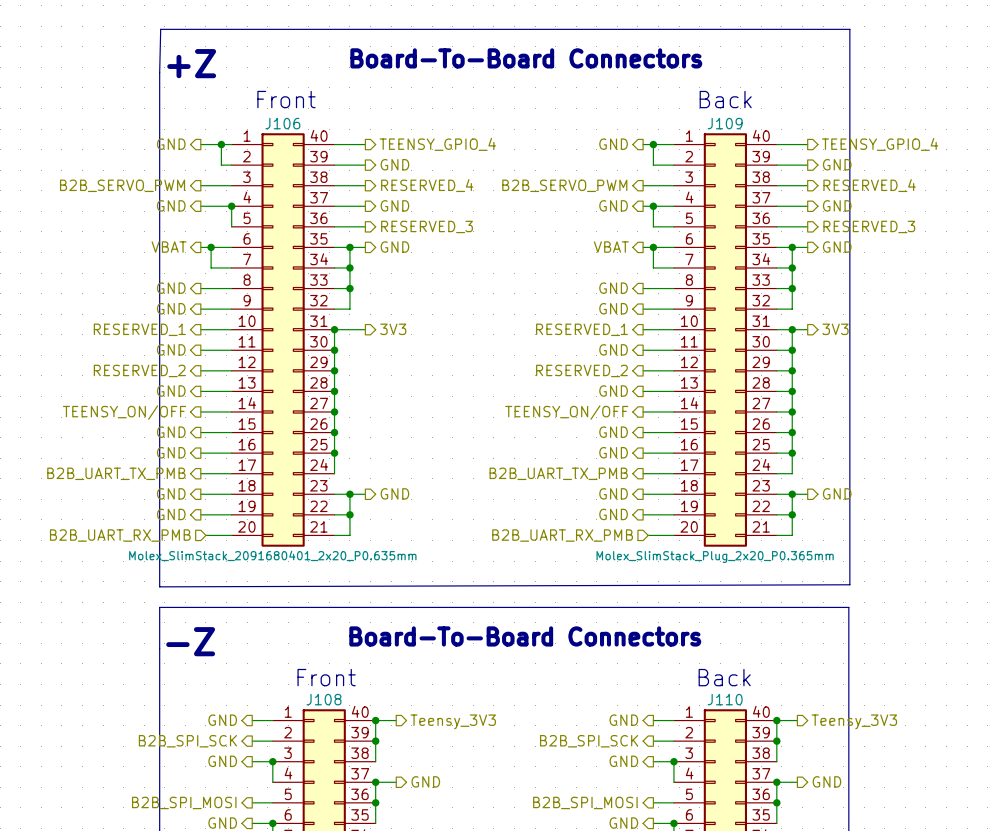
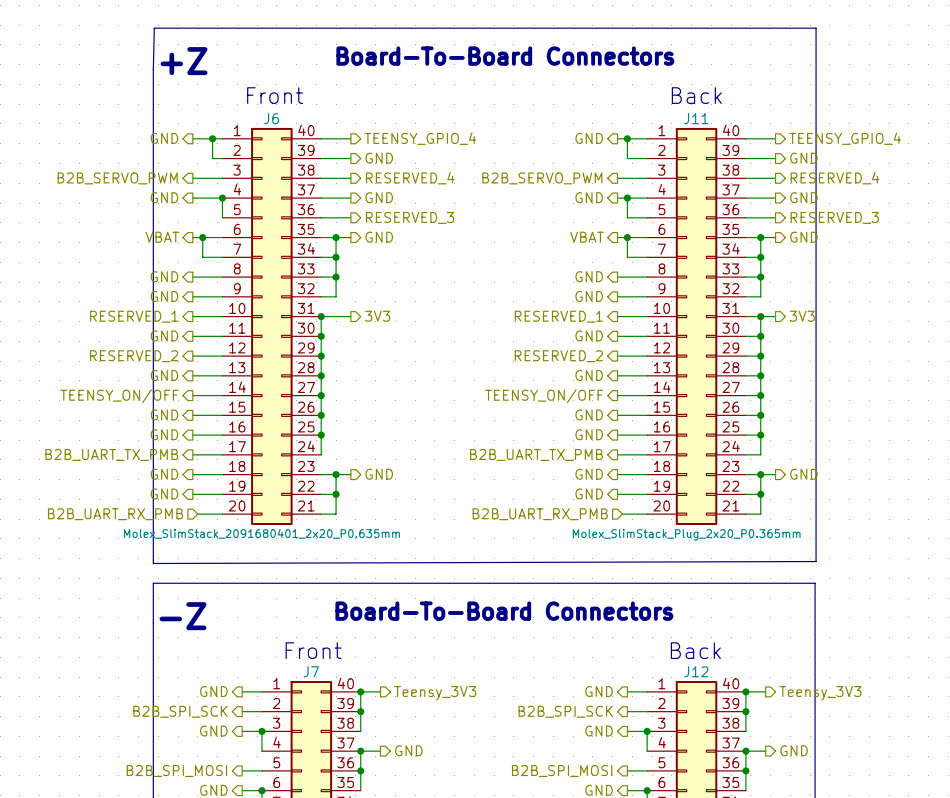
J106 name: J106 (282, 123) -> J6 (271, 118)
J109 name: J109 (725, 123) -> J11 (696, 118)
J108 name: J108 (324, 699) -> J7 (311, 671)
J110 name: J110 (725, 699) -> J12 (696, 671)

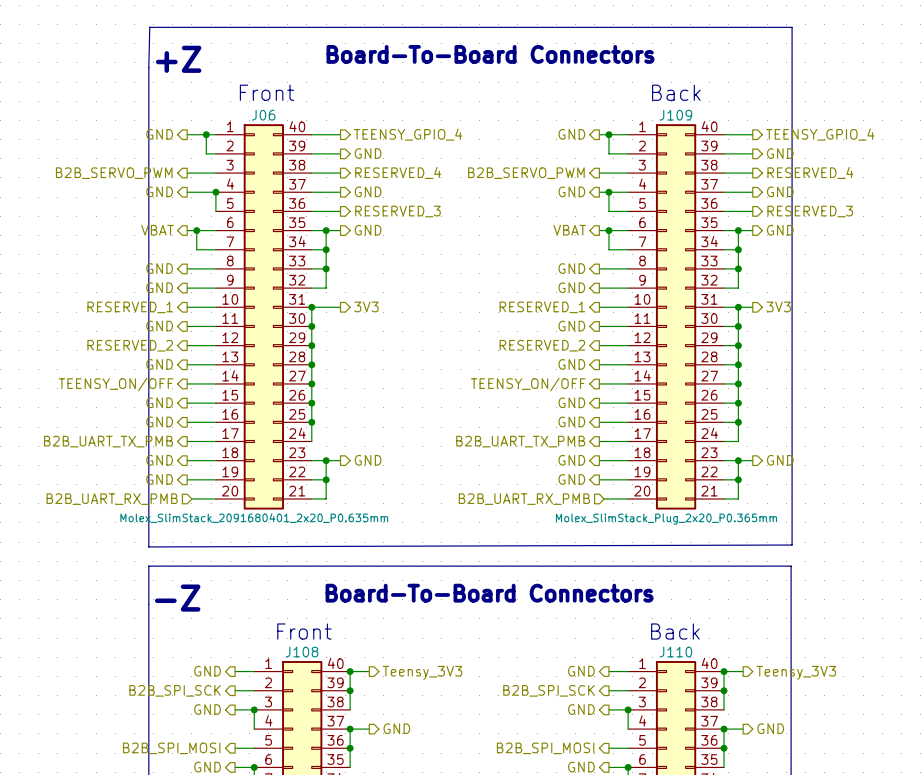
J6 name: J6 (271, 118) -> J06 (263, 115)
J11 name: J11 (696, 118) -> J109 (675, 115)
J7 name: J7 (311, 671) -> J108 (301, 652)
J12 name: J12 (696, 671) -> J110 (675, 652)

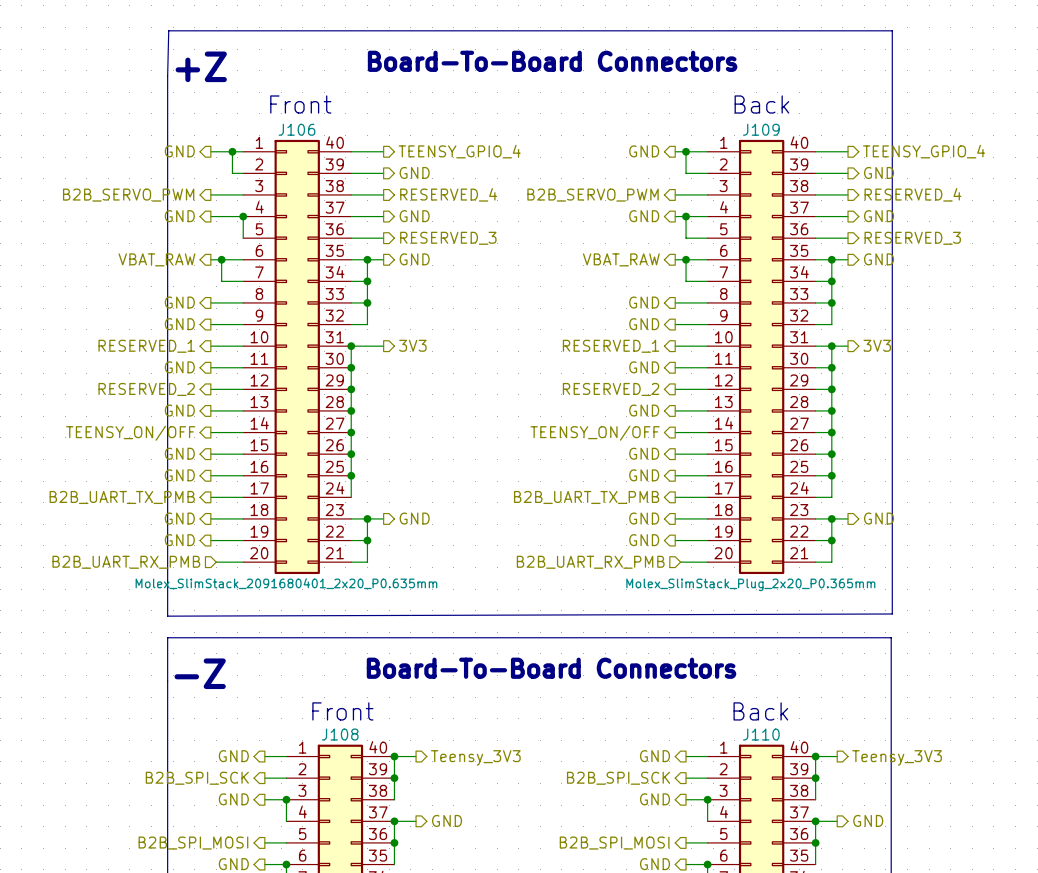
J06 name: J06 (263, 115) -> J106 (296, 129)
hierarchical label: VBAT (157, 230) -> VBAT_RAW (156, 259)
hierarchical label: VBAT (569, 230) -> VBAT_RAW (621, 259)

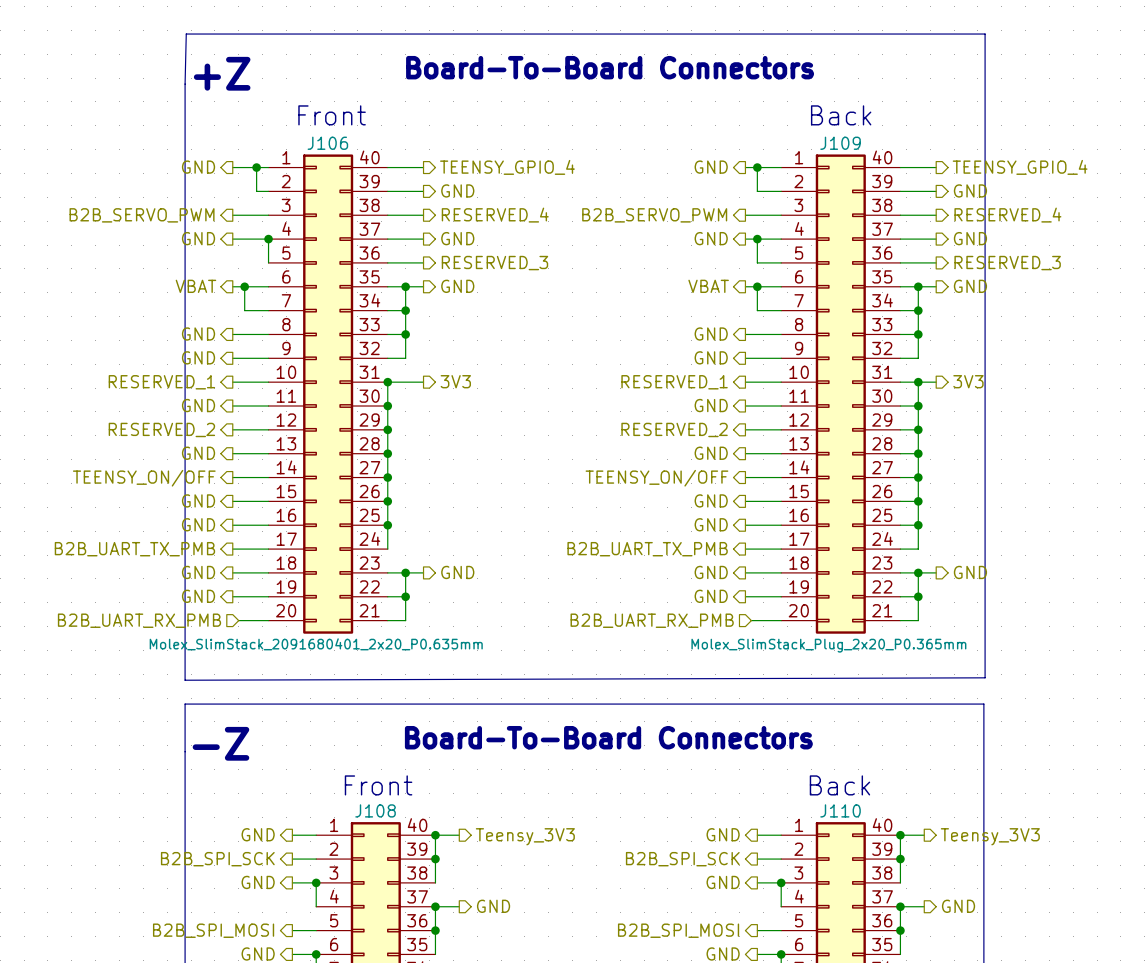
hierarchical label: VBAT_RAW (156, 259) -> VBAT (195, 286)
hierarchical label: VBAT_RAW (621, 259) -> VBAT (708, 286)

